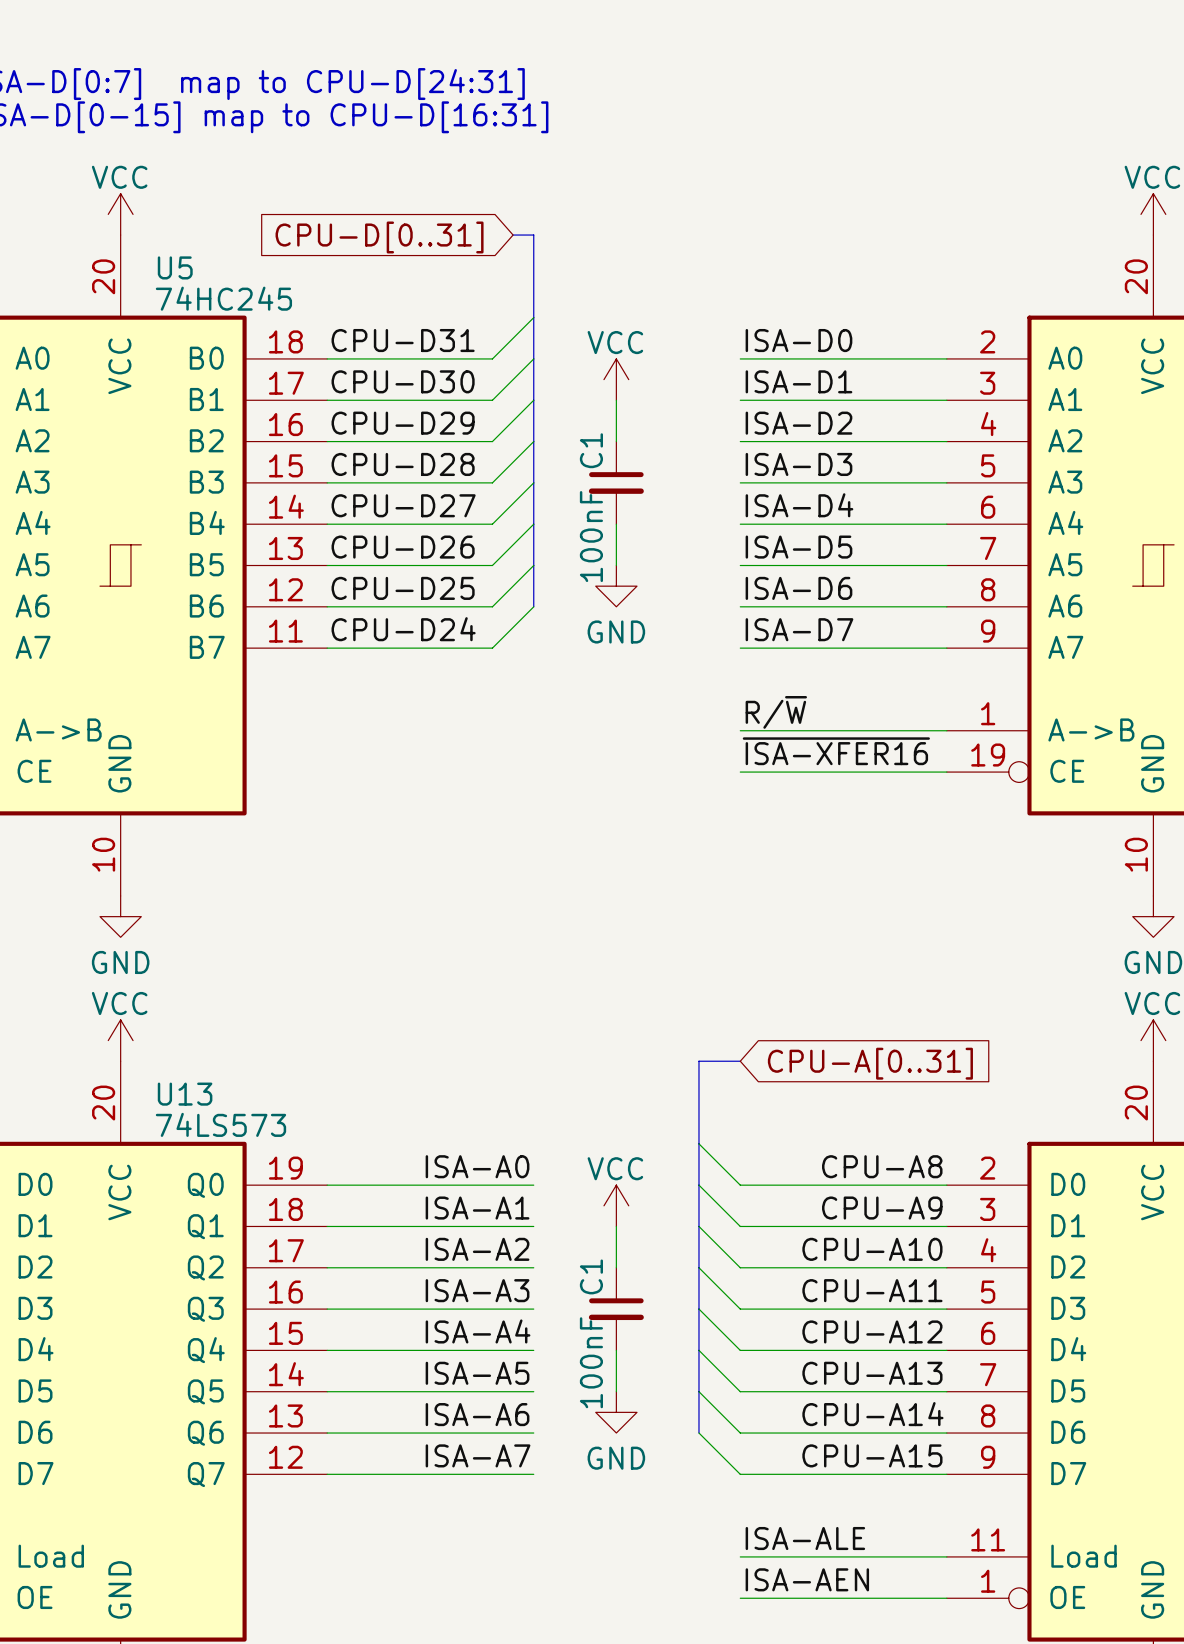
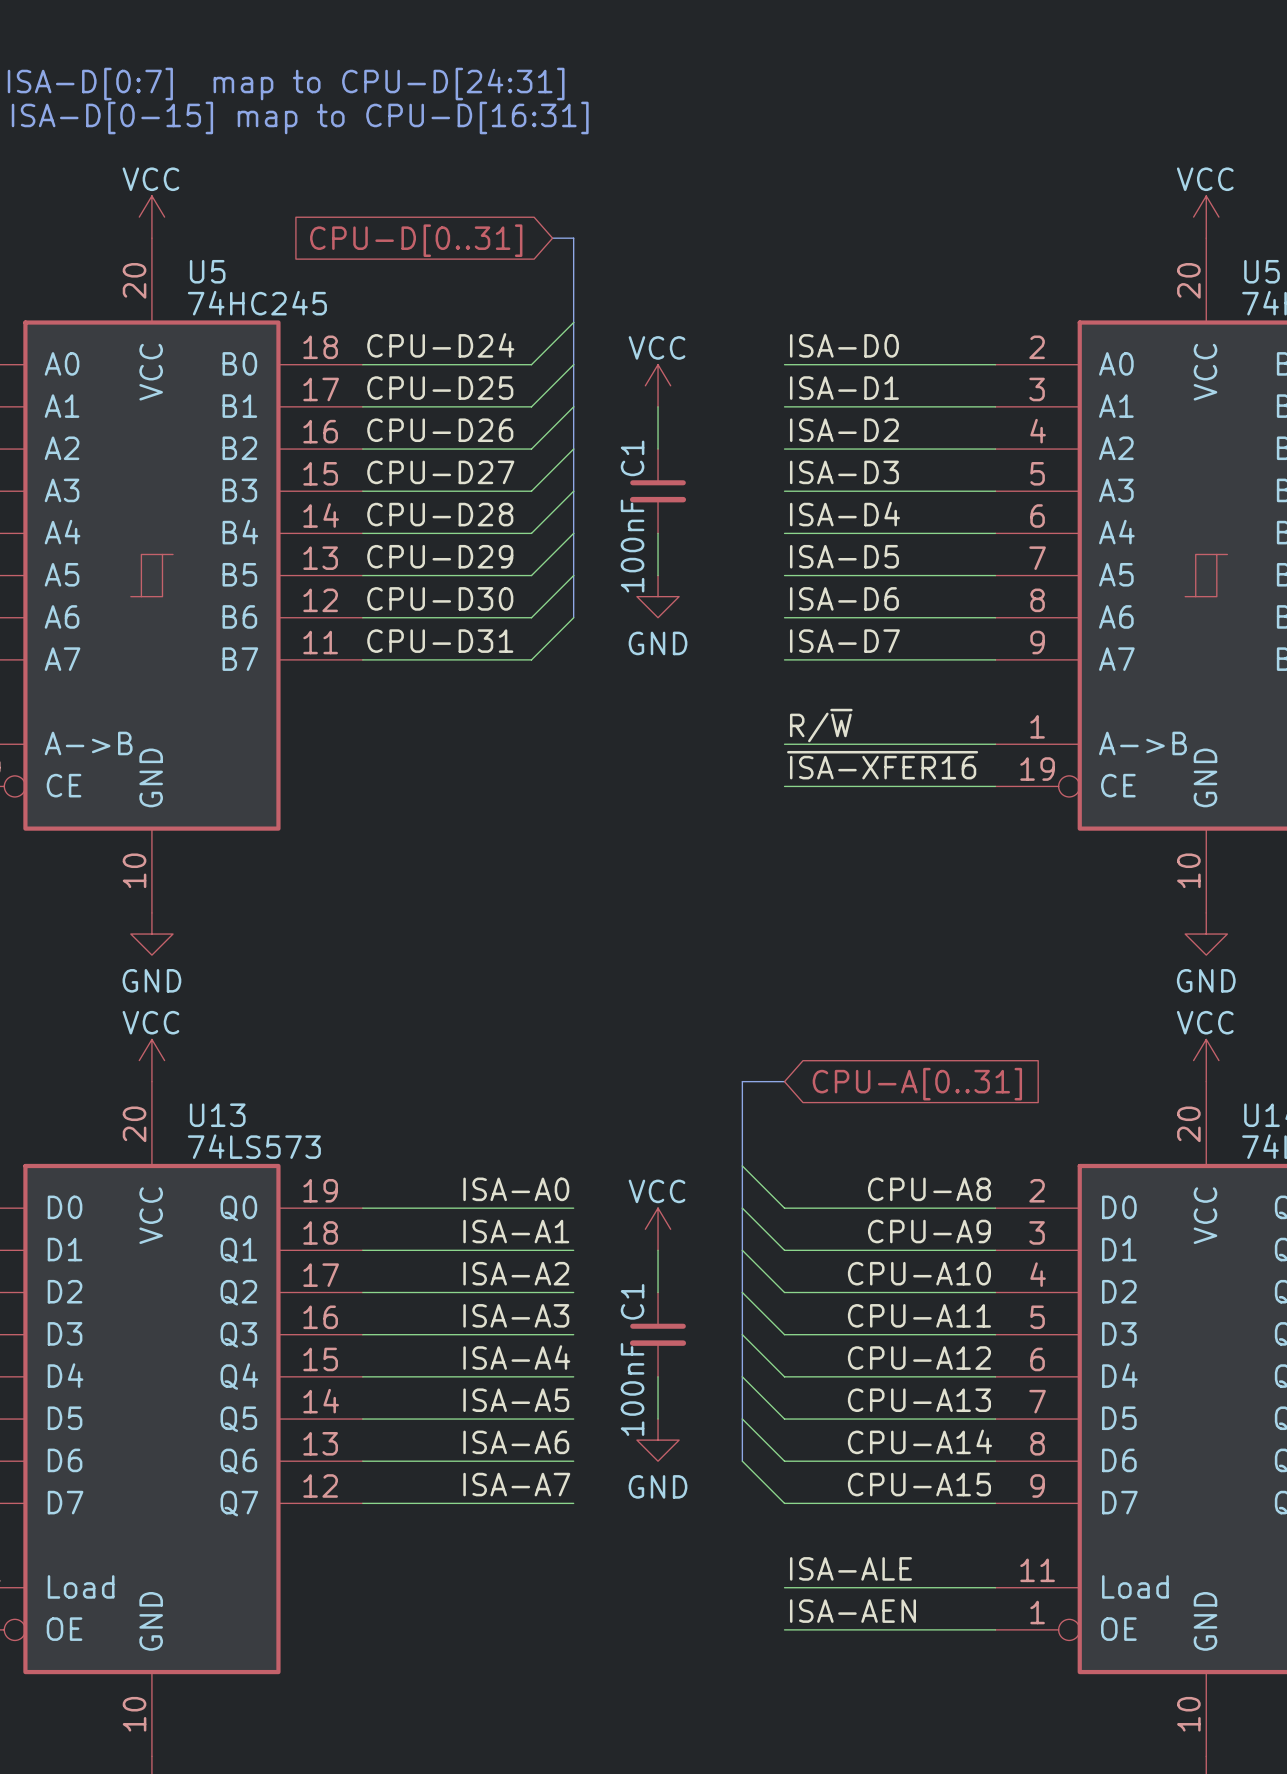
label: CPU-D31 (403, 340) -> CPU-D24 (440, 345)
label: CPU-D30 (403, 381) -> CPU-D25 (440, 388)
label: CPU-D29 (403, 423) -> CPU-D26 (440, 430)
label: CPU-D28 (403, 464) -> CPU-D27 (440, 472)
label: CPU-D27 (403, 505) -> CPU-D28 (440, 514)
label: CPU-D26 (403, 547) -> CPU-D29 (440, 556)
label: CPU-D25 (403, 588) -> CPU-D30 (440, 598)
label: CPU-D24 (403, 629) -> CPU-D31 (440, 641)

